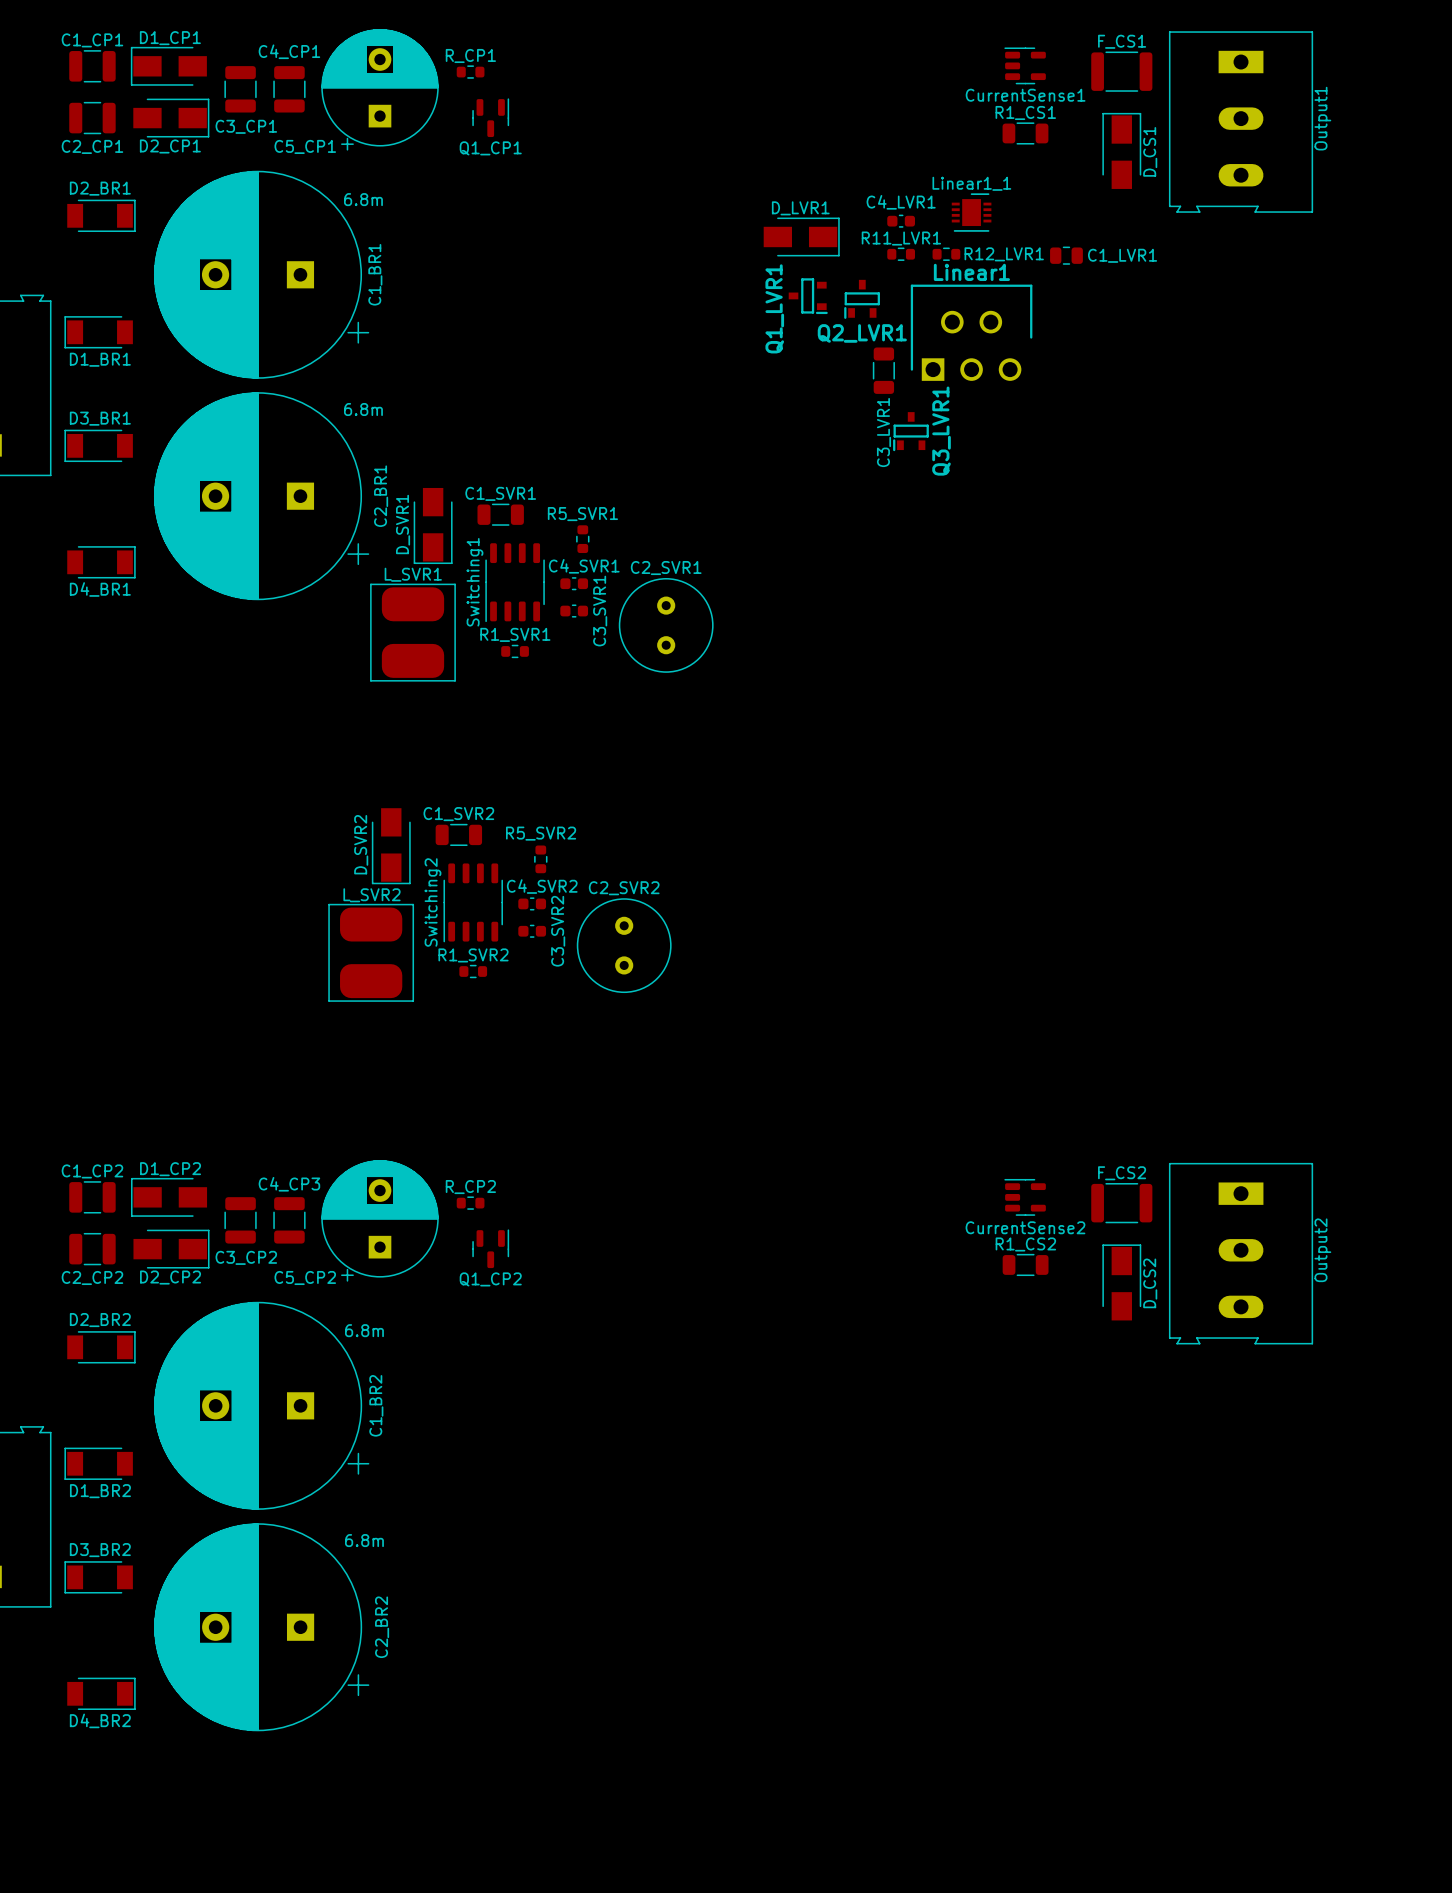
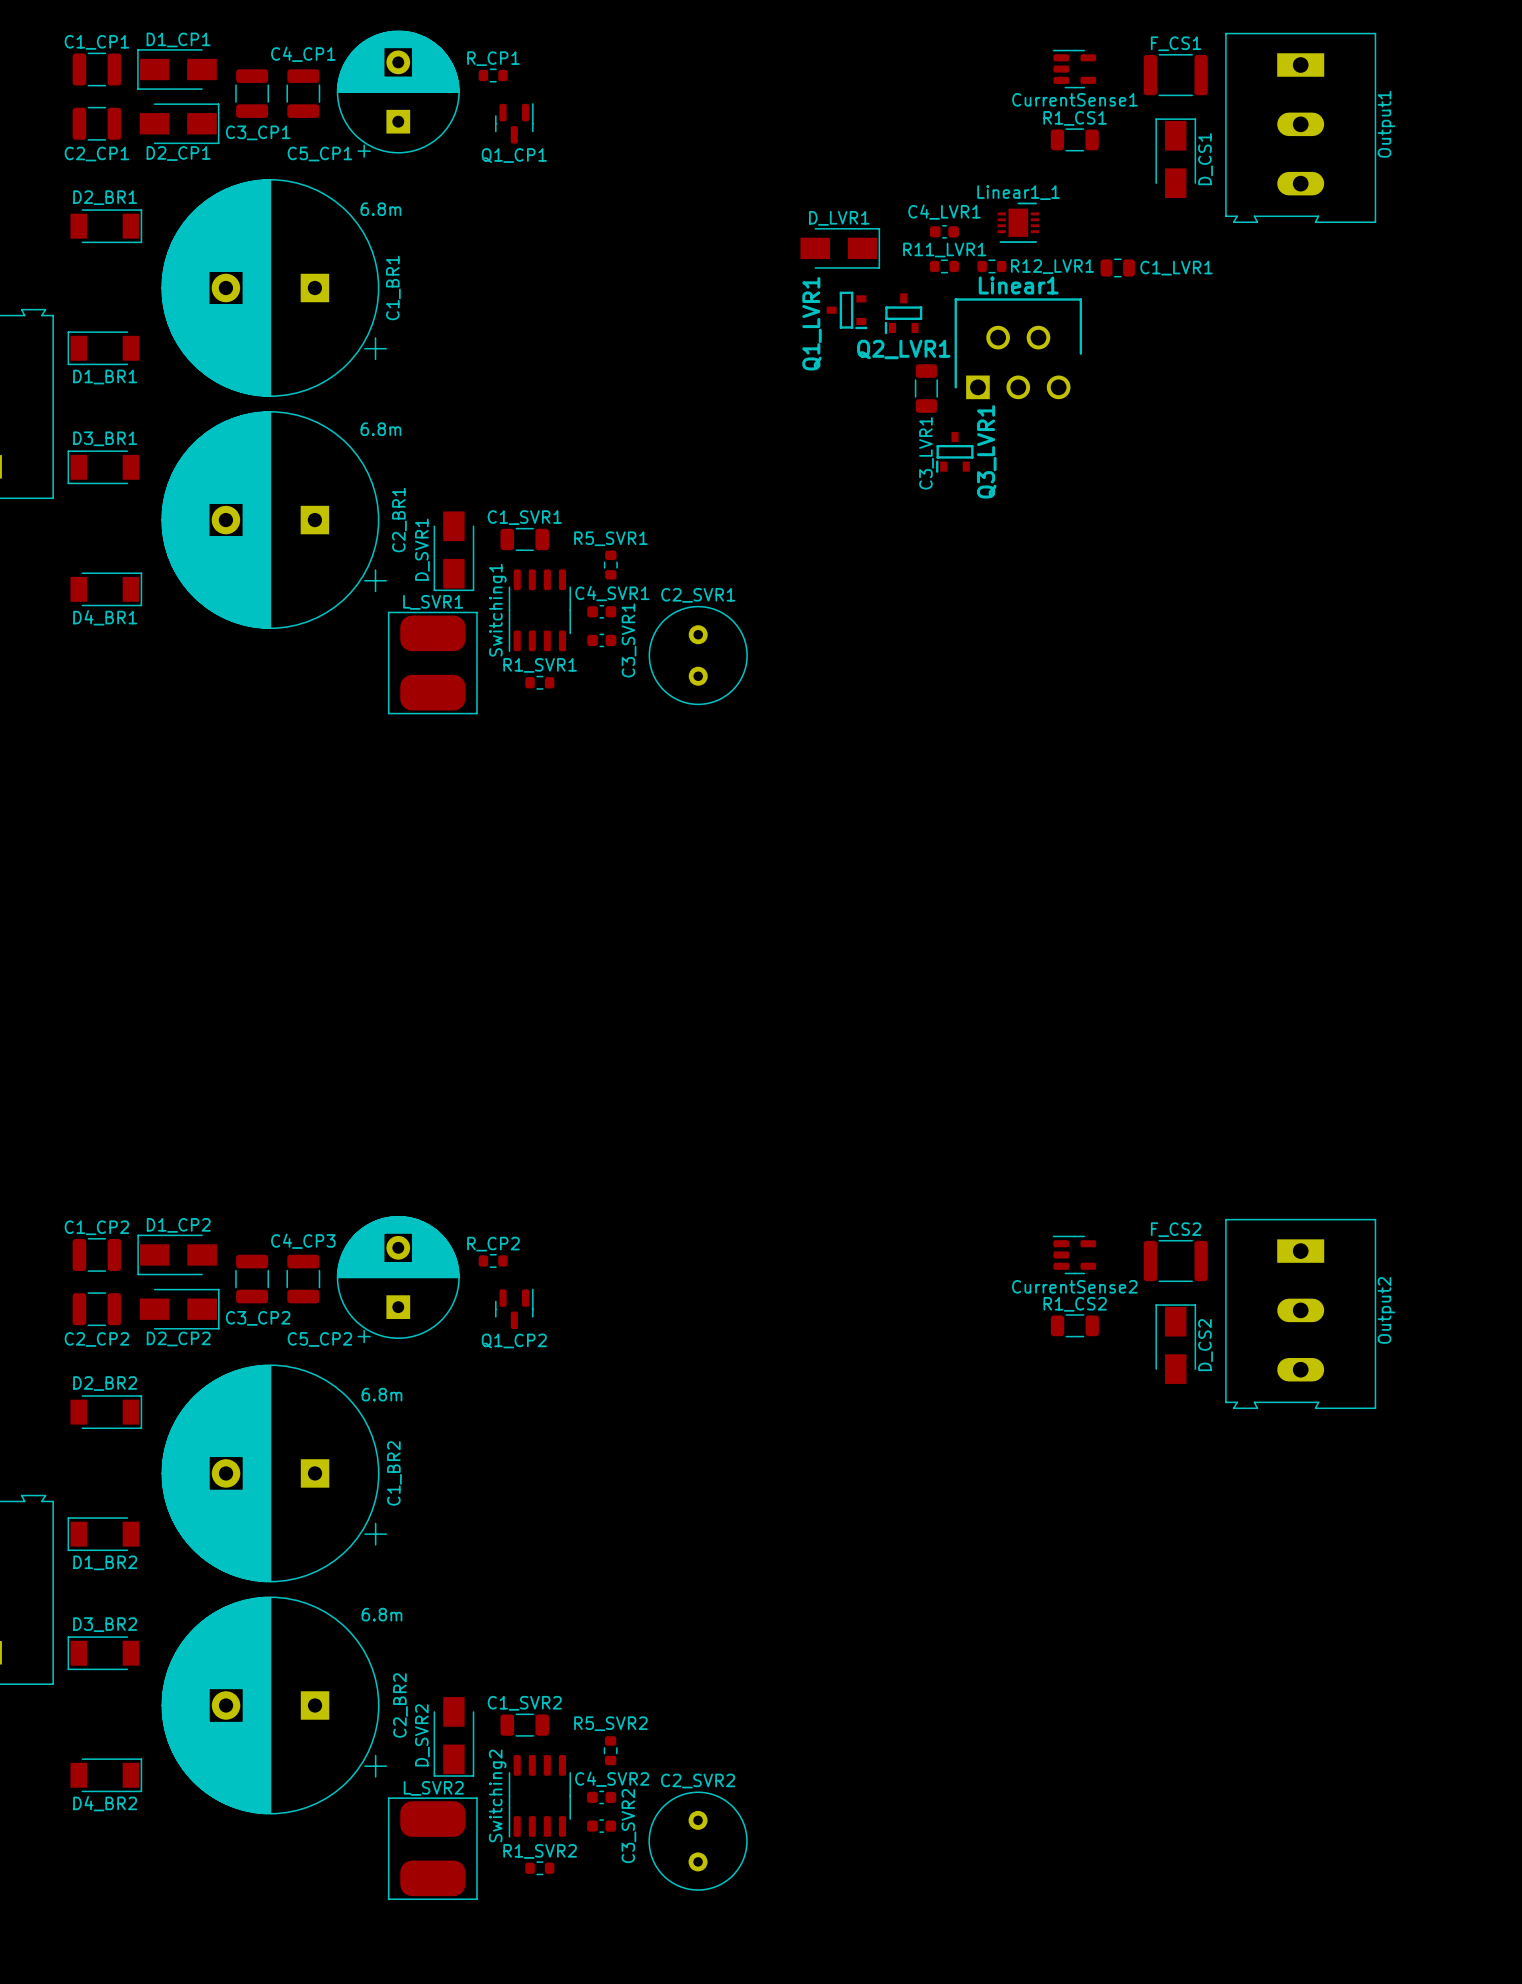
C1_SVR2 position: (458, 834) -> (524, 1725)
D_SVR2 position: (391, 846) -> (453, 1736)
R5_SVR2 position: (540, 859) -> (610, 1750)
Switching2 position: (473, 902) -> (539, 1796)
C4_SVR2 position: (532, 903) -> (601, 1797)
C3_SVR2 position: (532, 931) -> (601, 1826)
C2_SVR2 position: (624, 945) -> (698, 1841)
L_SVR2 position: (371, 952) -> (432, 1848)
R1_SVR2 position: (473, 971) -> (539, 1868)

